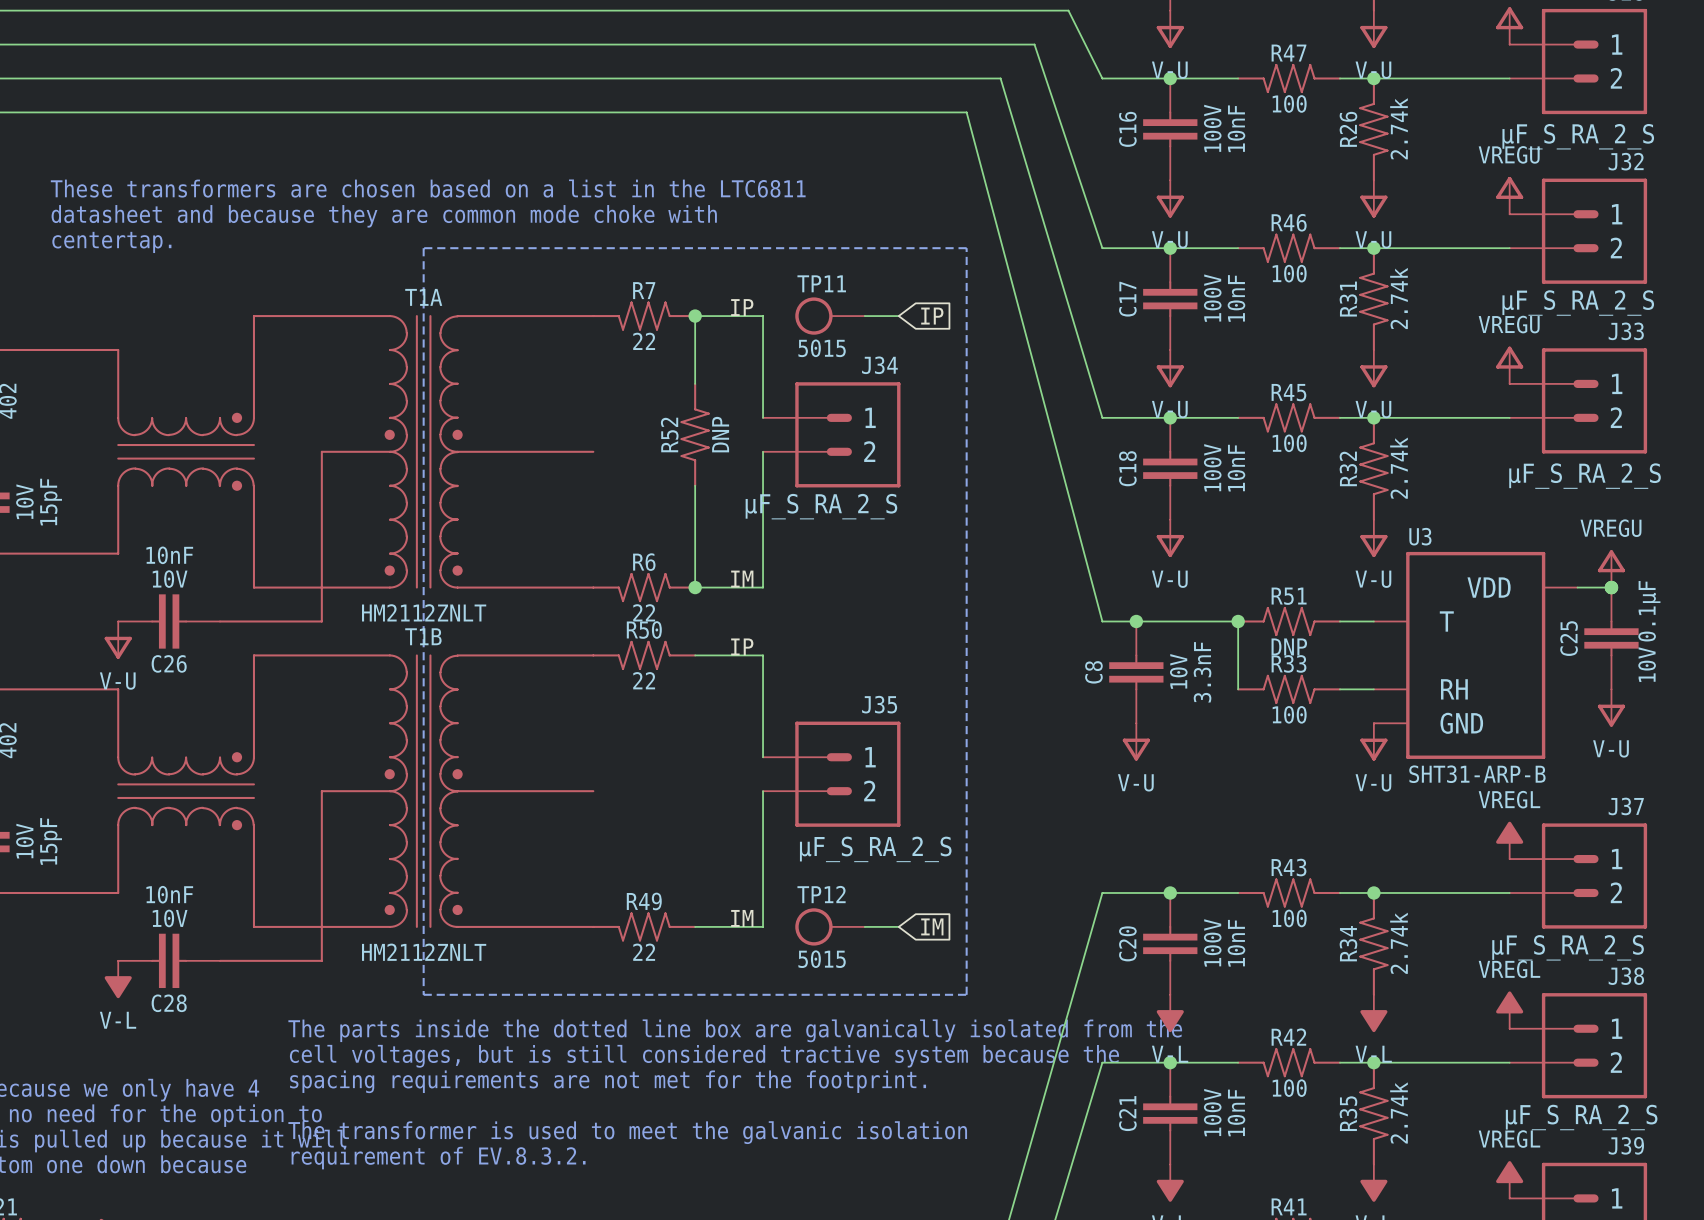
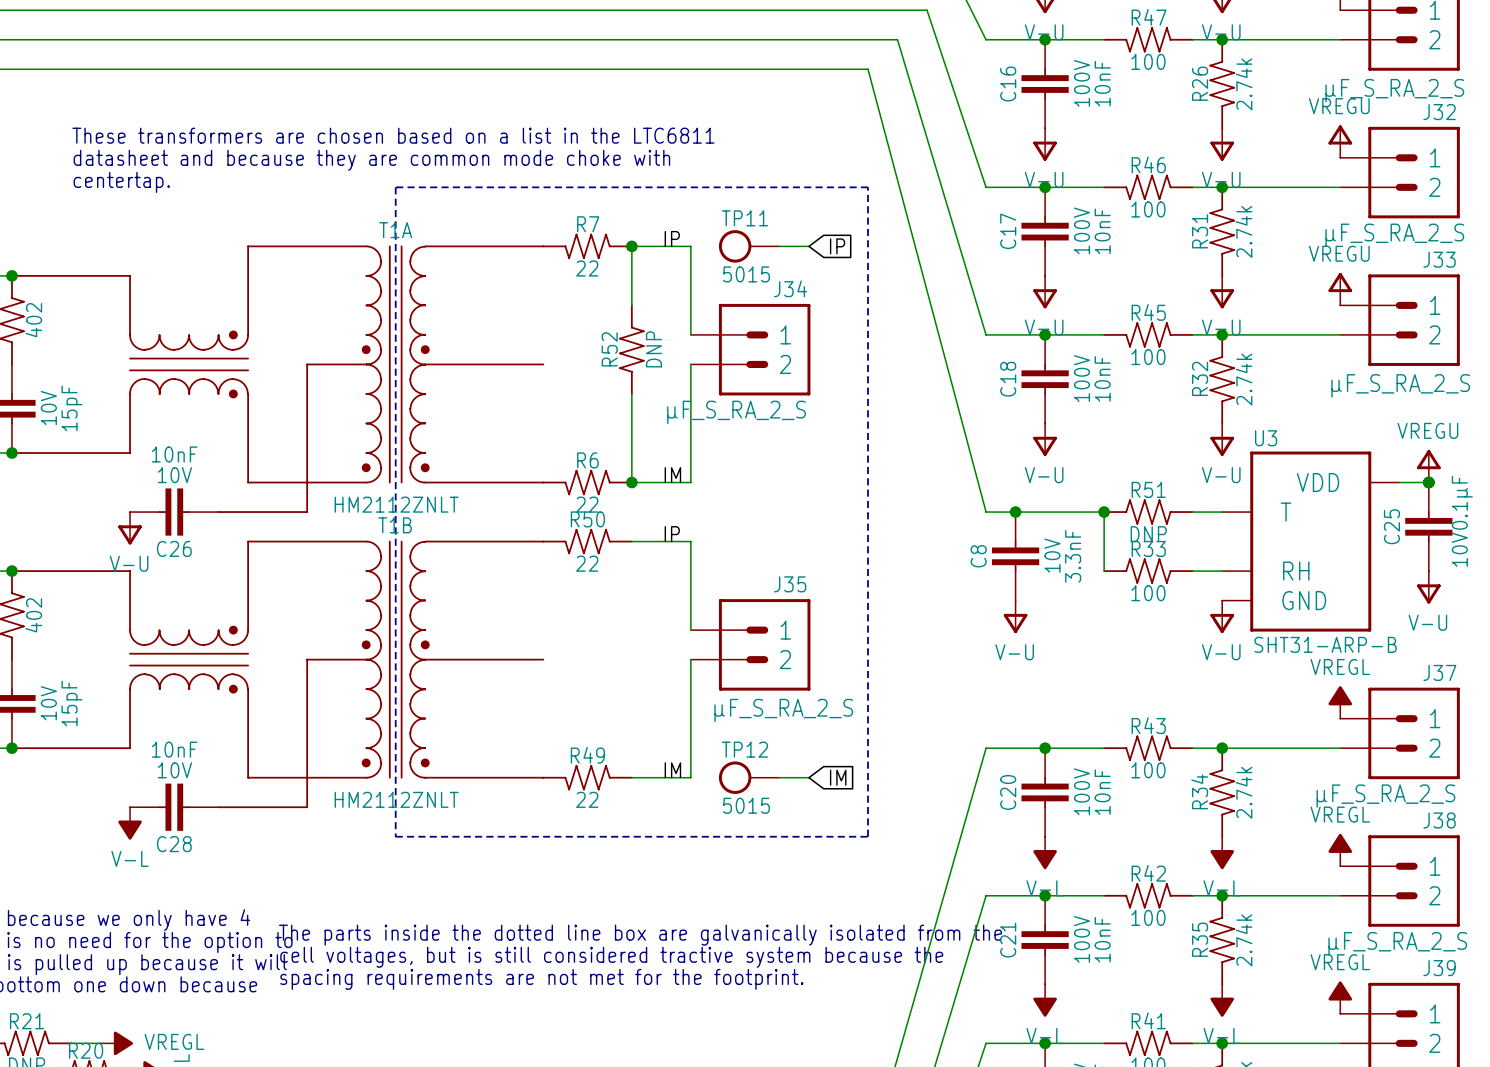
text position: The parts inside the dotted line box are galvanically isolated from the (735, 1030) -> The parts inside the dotted line box are galvanically isolated from the (640, 935)
text: cell voltages, but is still considered tractive system because the (704, 1056) -> none
text: spacing requirements are not met for the footprint. (608, 1081) -> none
text: The transformer is used to meet the galvanic isolation (627, 1132) -> cell voltages, but is still considered tractive system because the (611, 957)
text: requirement of EV.8.3.2. (438, 1158) -> spacing requirements are not met for the footprint. (541, 979)

